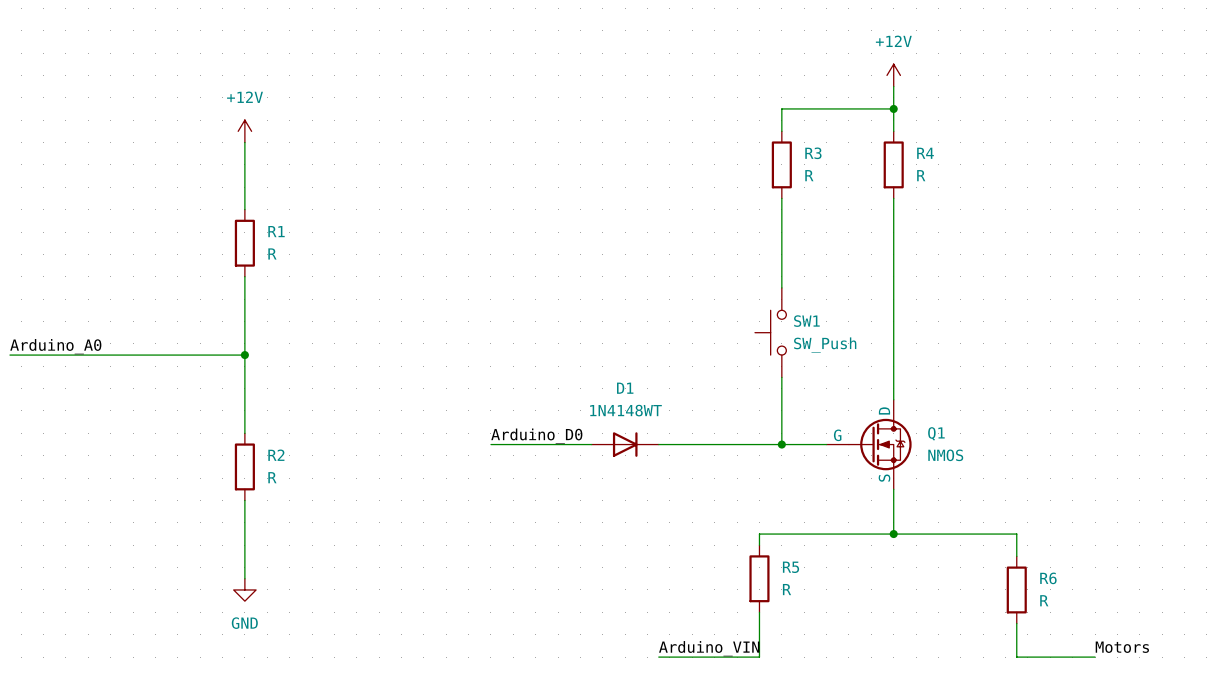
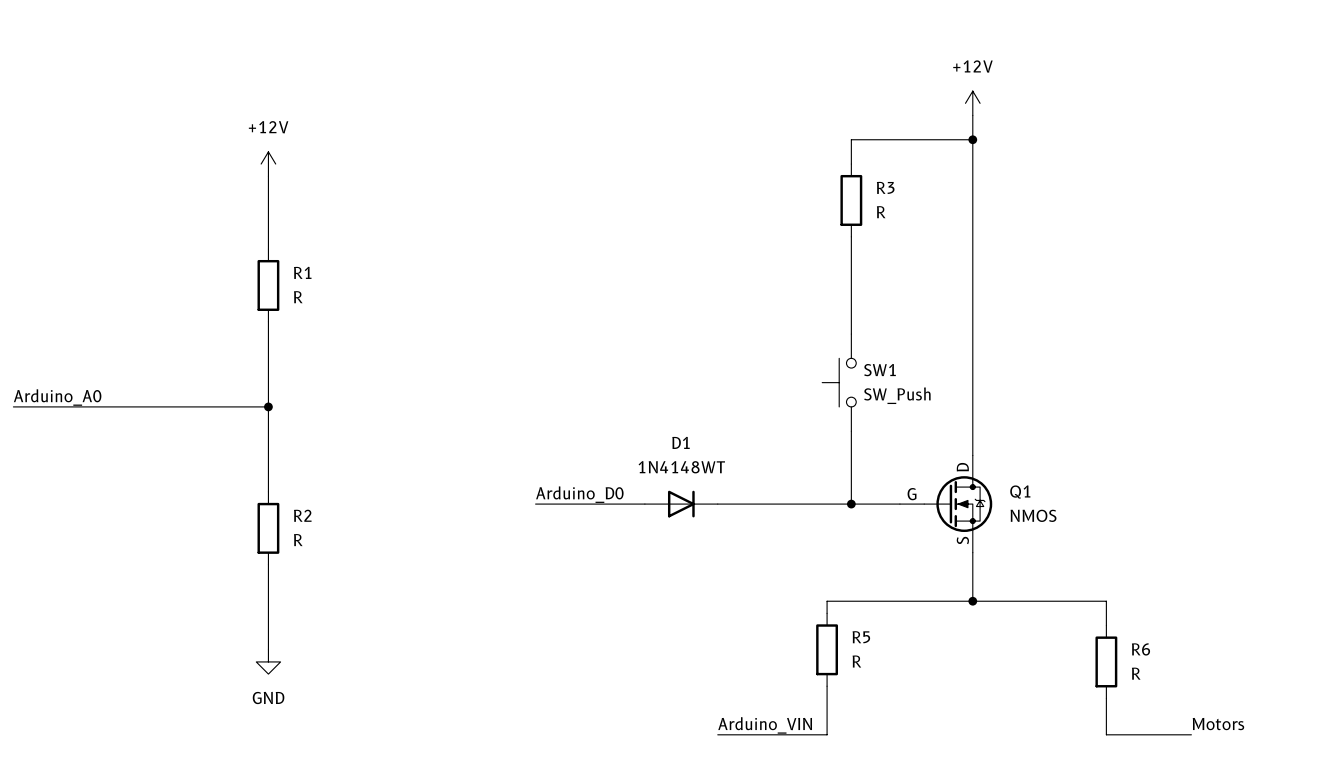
wire: none -> (972, 164) (972, 236)
R4: R (893, 164) -> none

